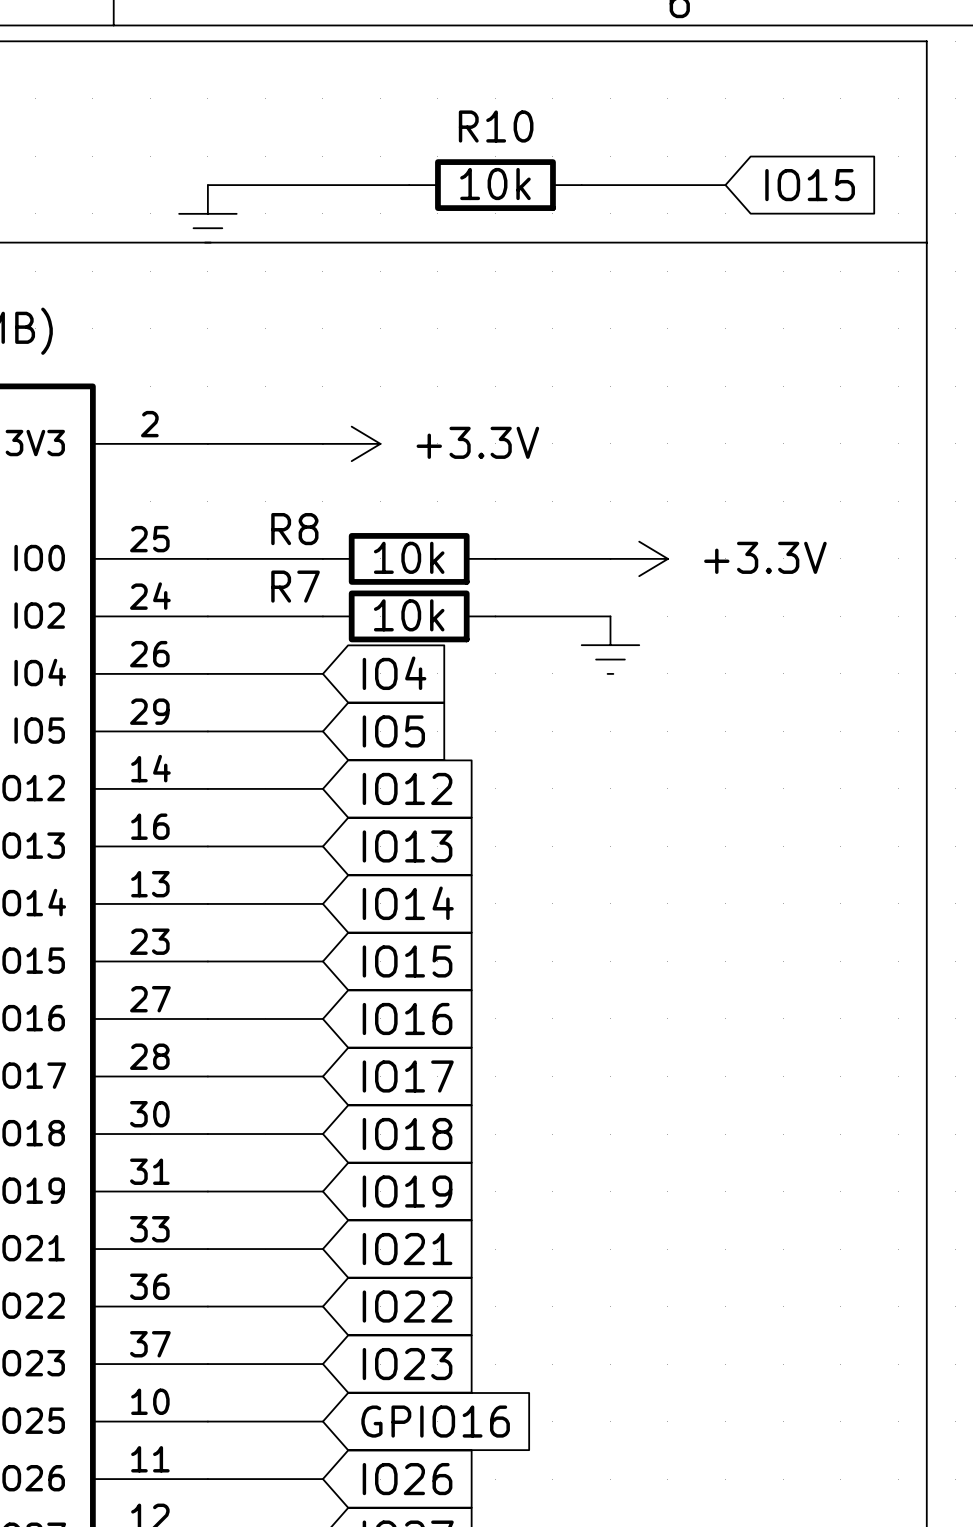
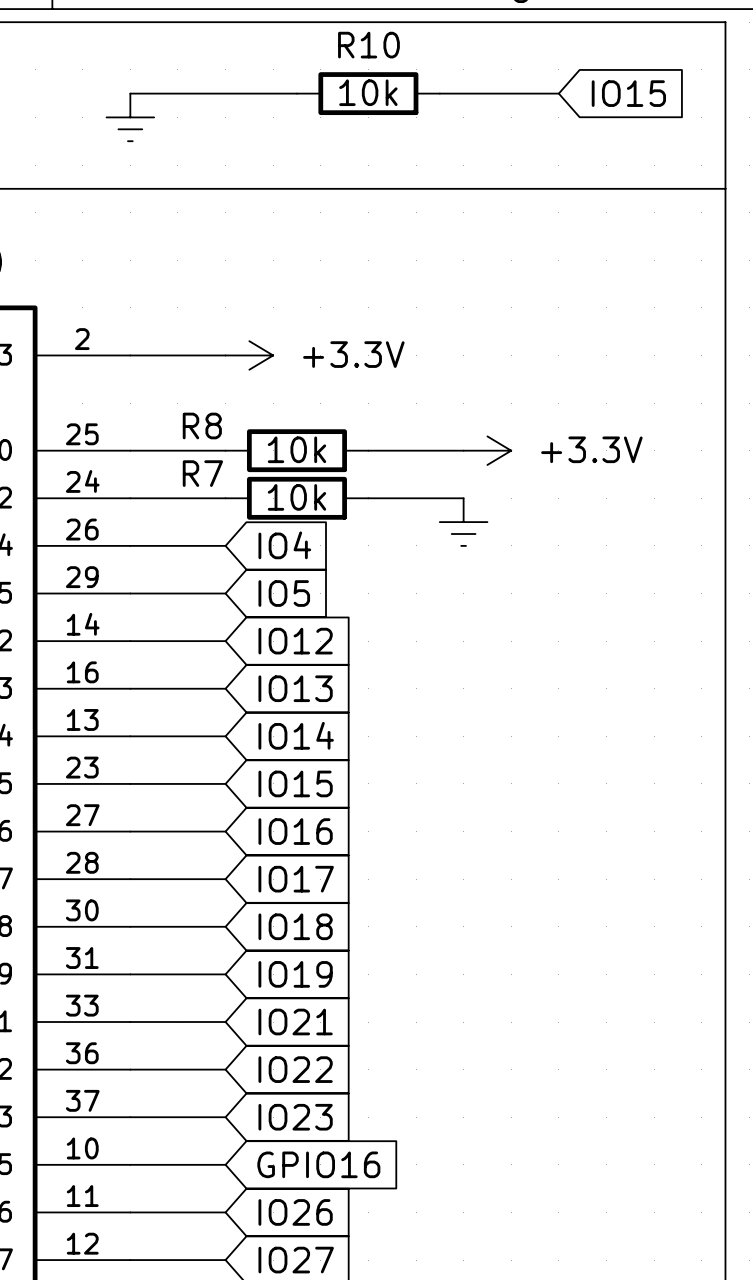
wire: (207, 185) (409, 185) -> (130, 93) (296, 93)
R10 position: (495, 185) -> (368, 93)
wire: (581, 185) (725, 185) -> (439, 93) (558, 93)
global label position: IO15 (810, 185) -> IO15 (628, 93)
power symbol position: (207, 213) -> (130, 117)

